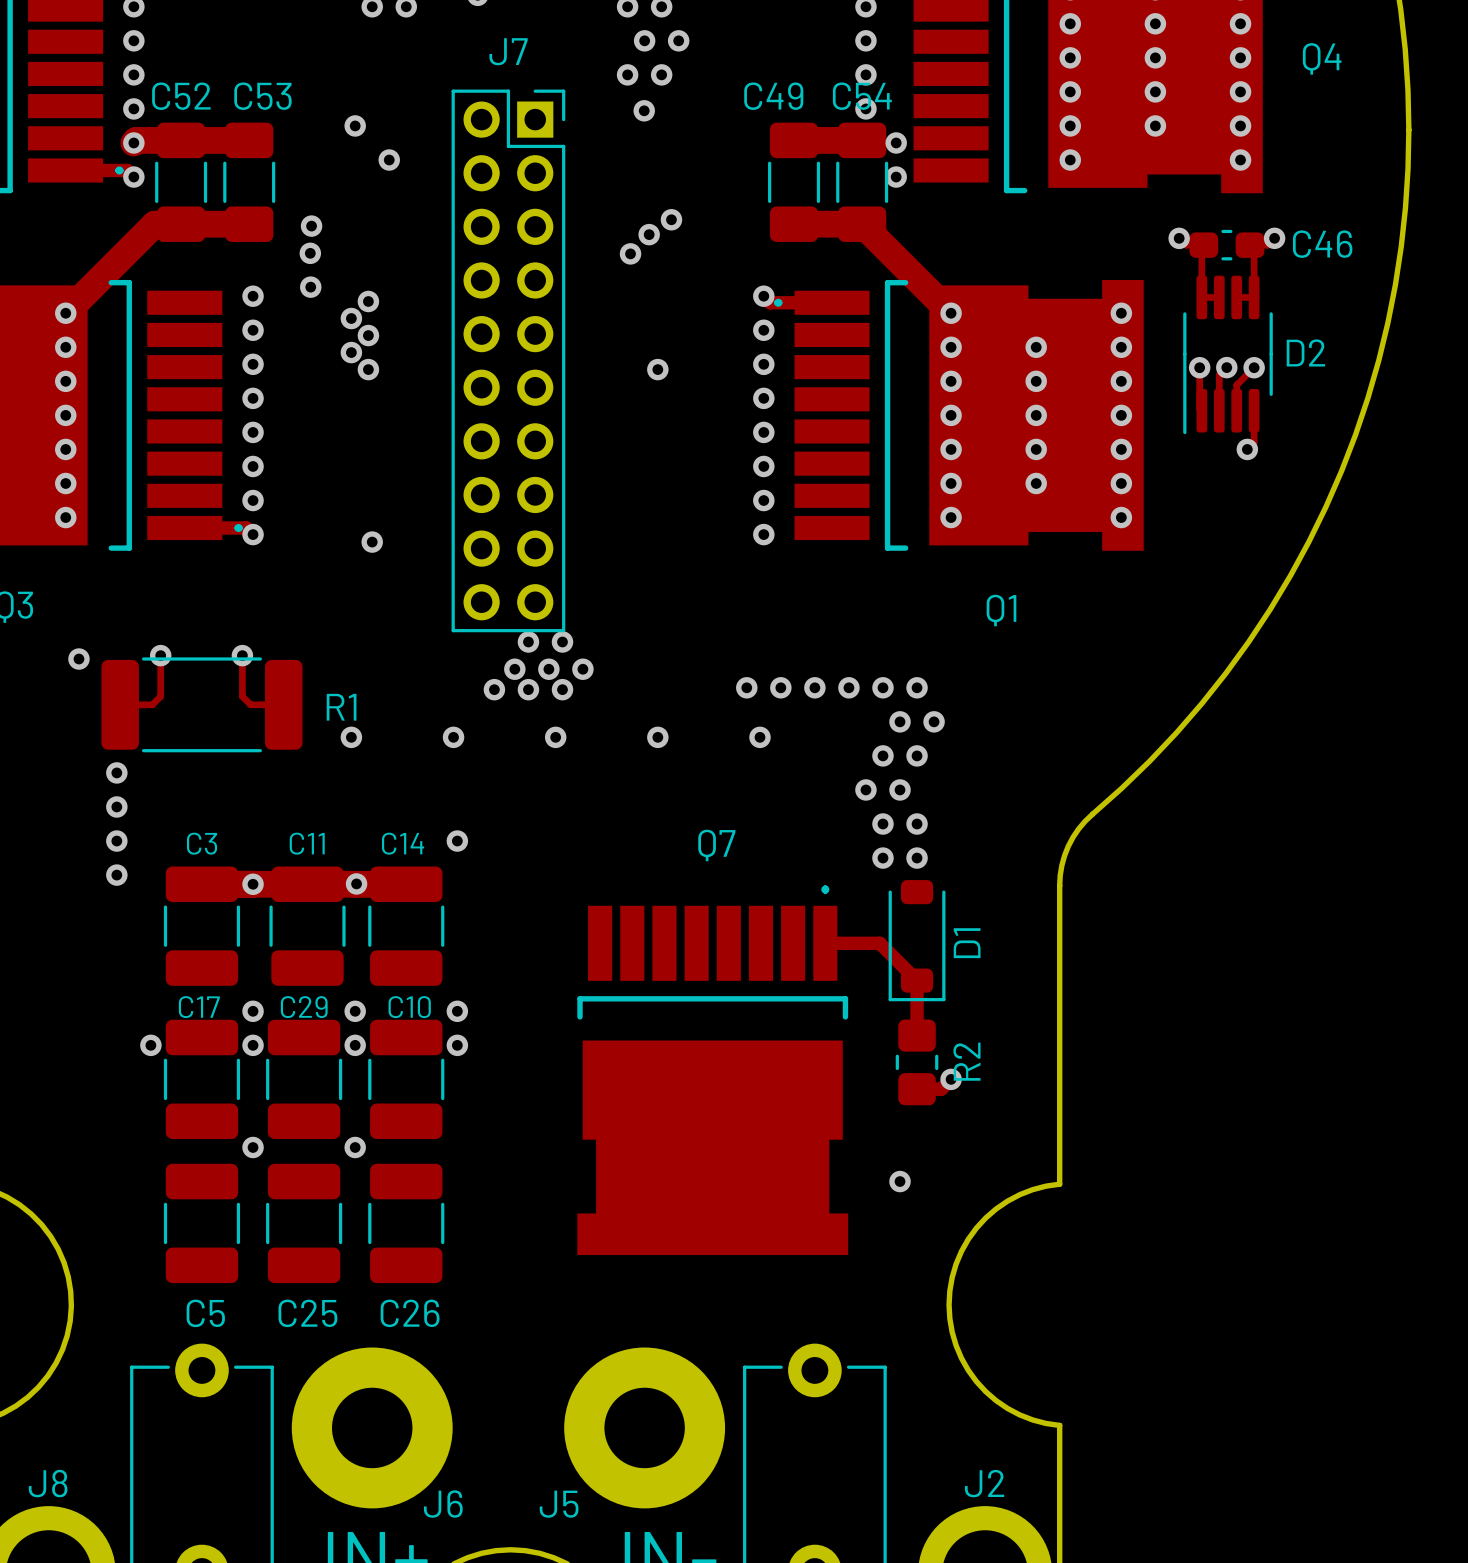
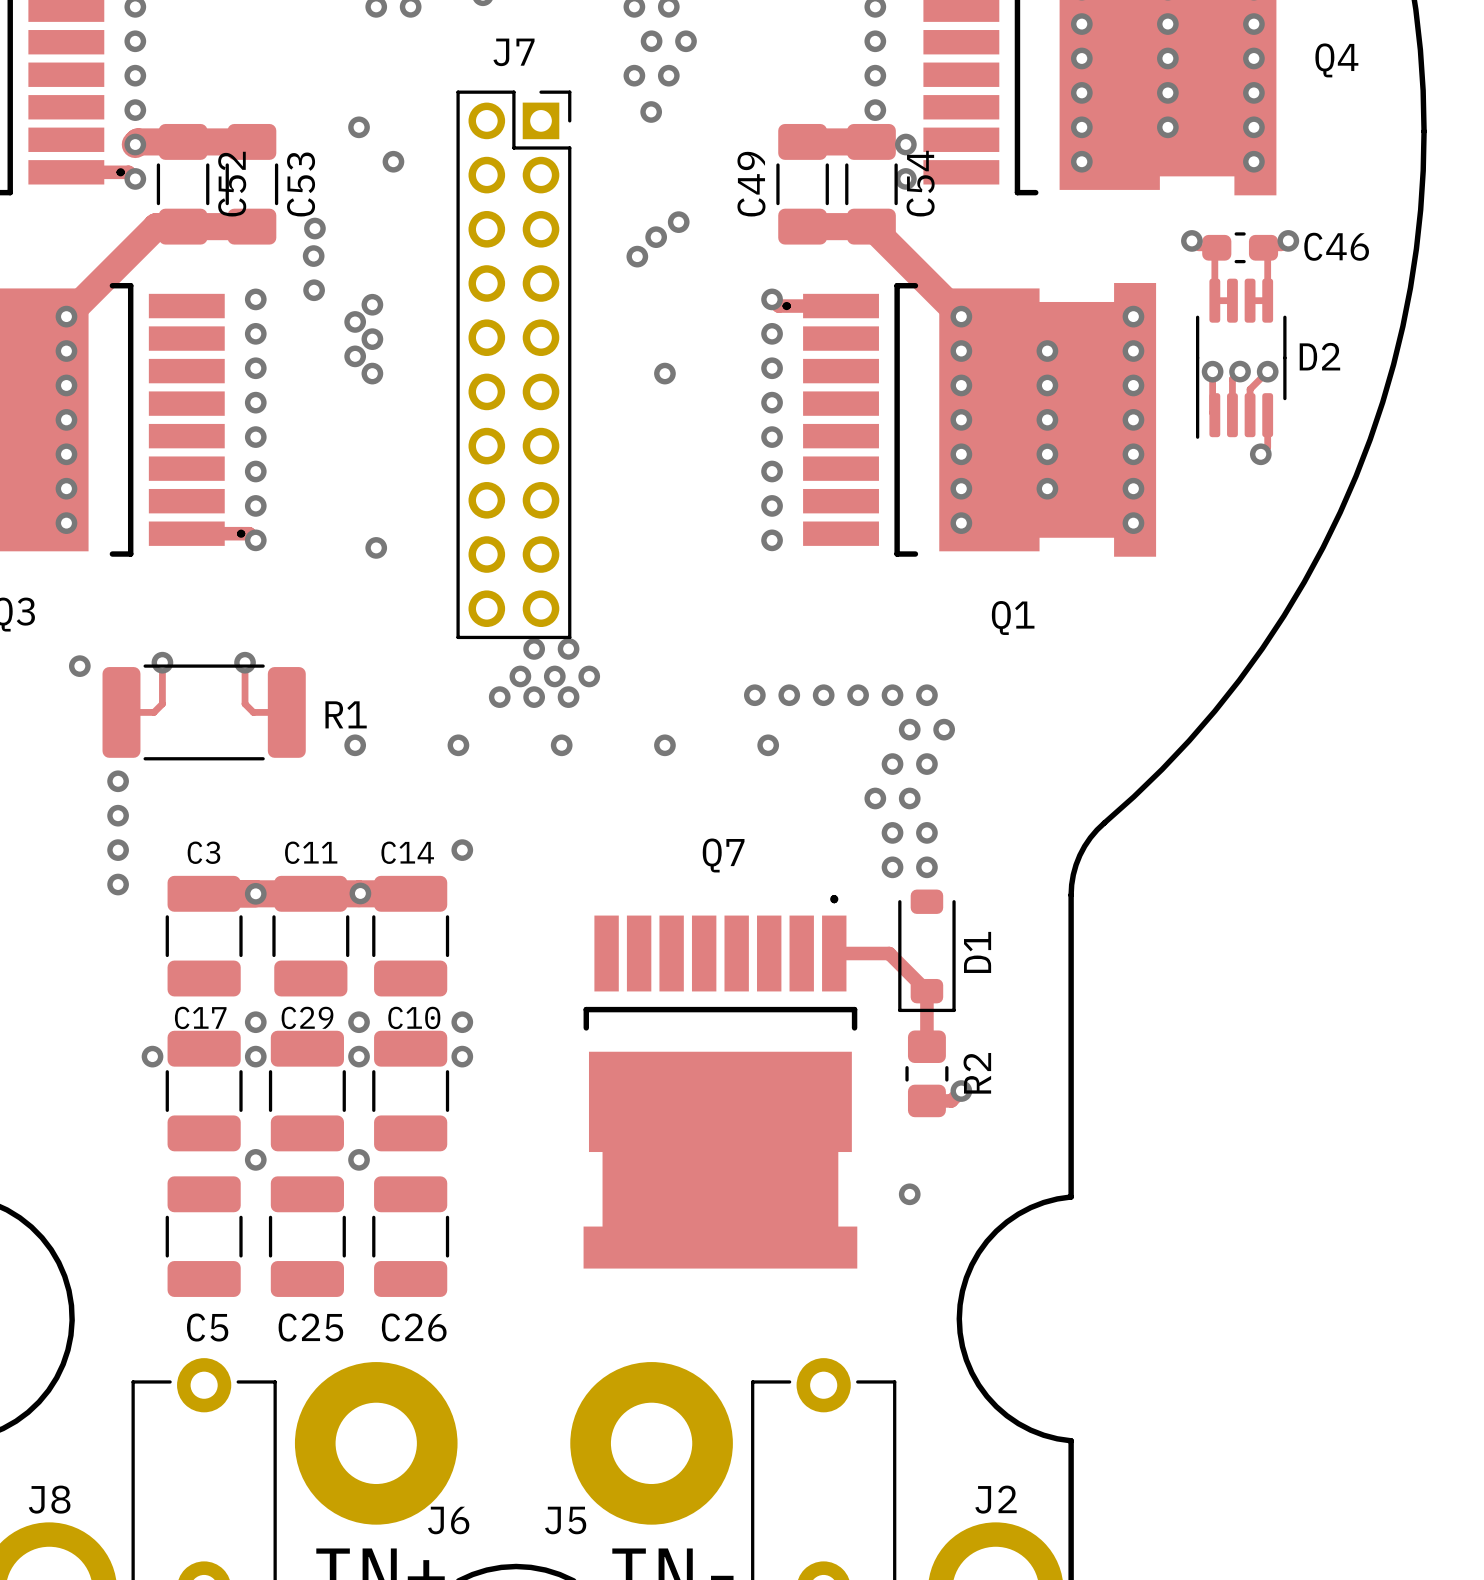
C52 name rotation: 0° (181, 96) -> 90° counterclockwise (232, 184)
C52 name position: C52 (181, 96) -> C52 (232, 184)
C53 name rotation: 0° (262, 96) -> 90° counterclockwise (301, 184)
C49 name rotation: 0° (773, 96) -> 90° counterclockwise (751, 184)
C54 name rotation: 0° (862, 96) -> 90° counterclockwise (920, 183)
C54 name position: C54 (862, 96) -> C54 (920, 183)

